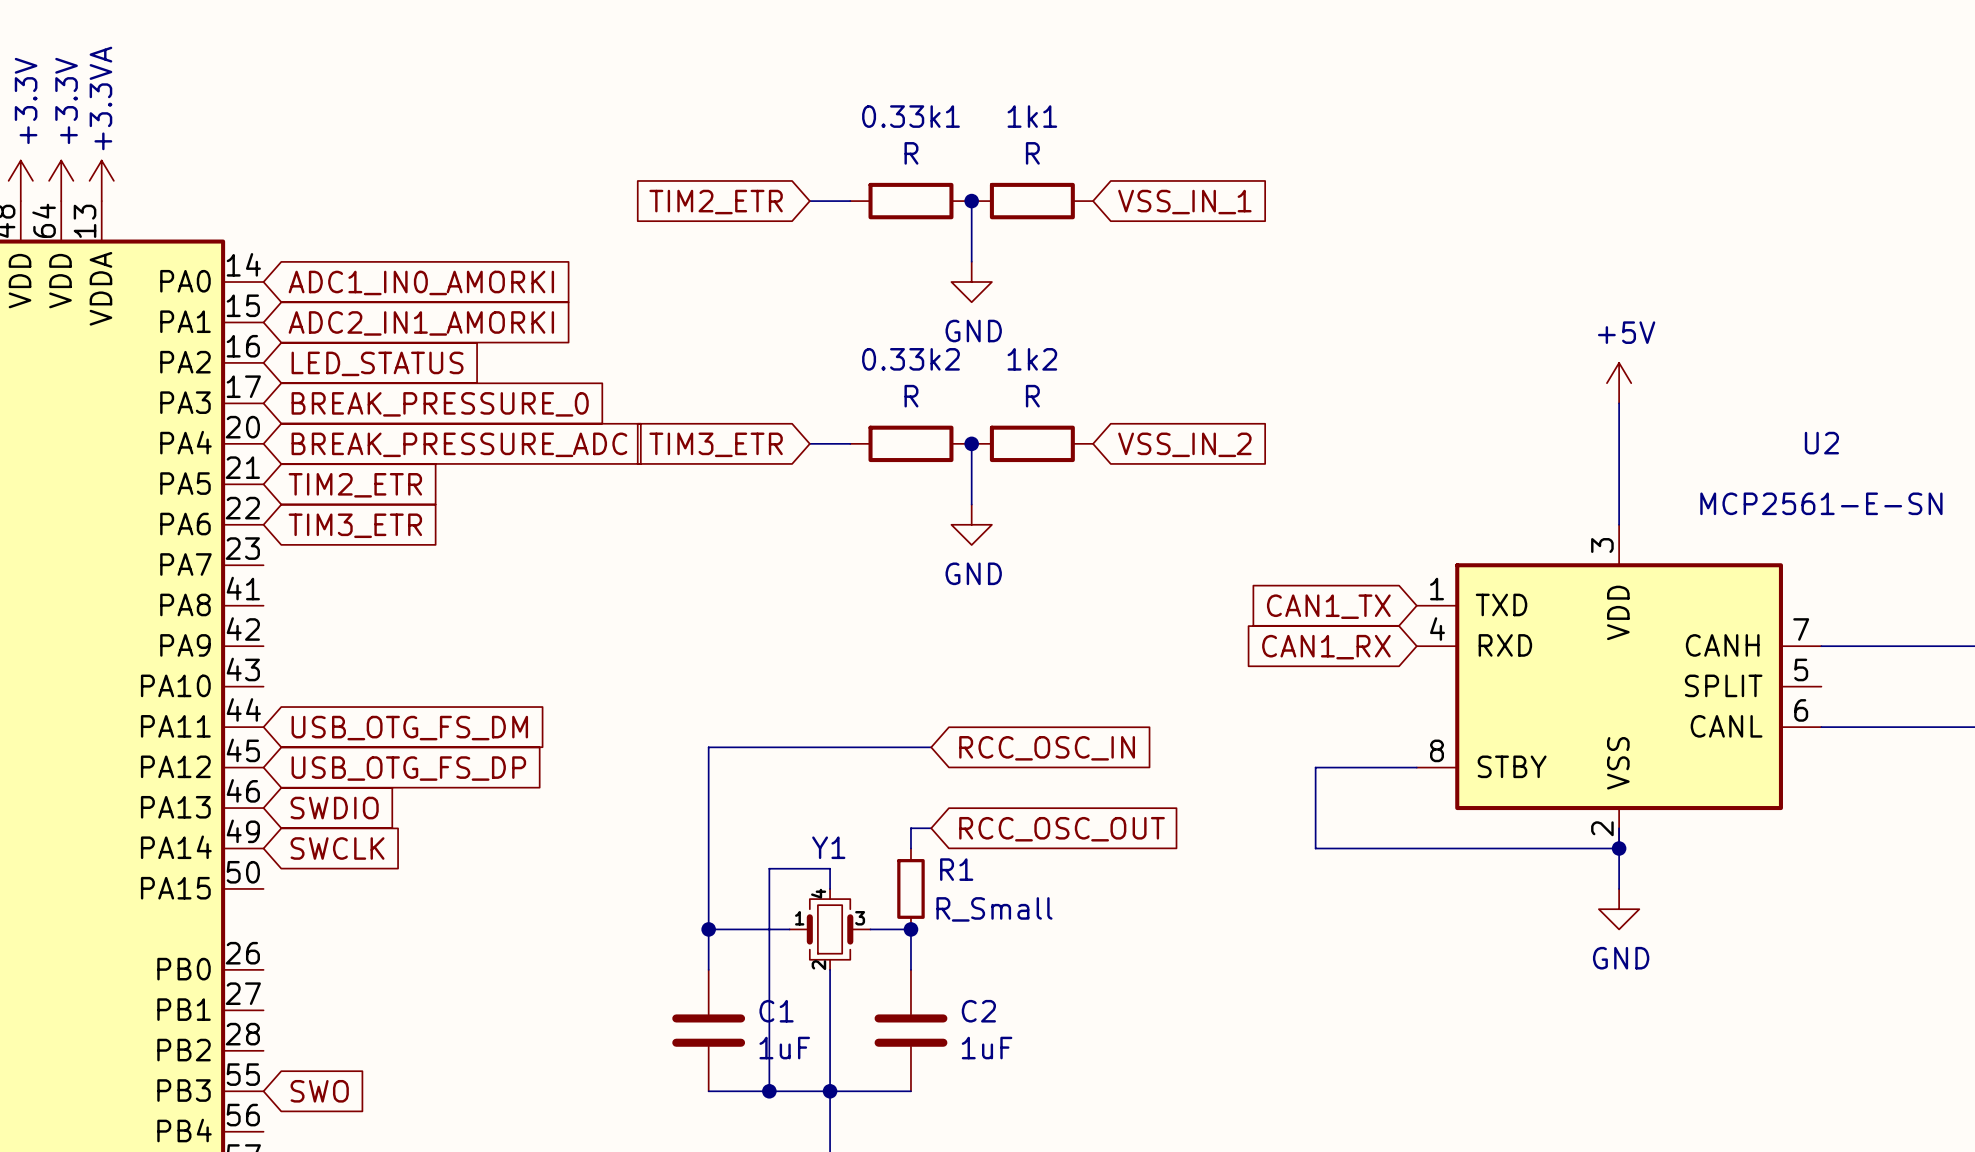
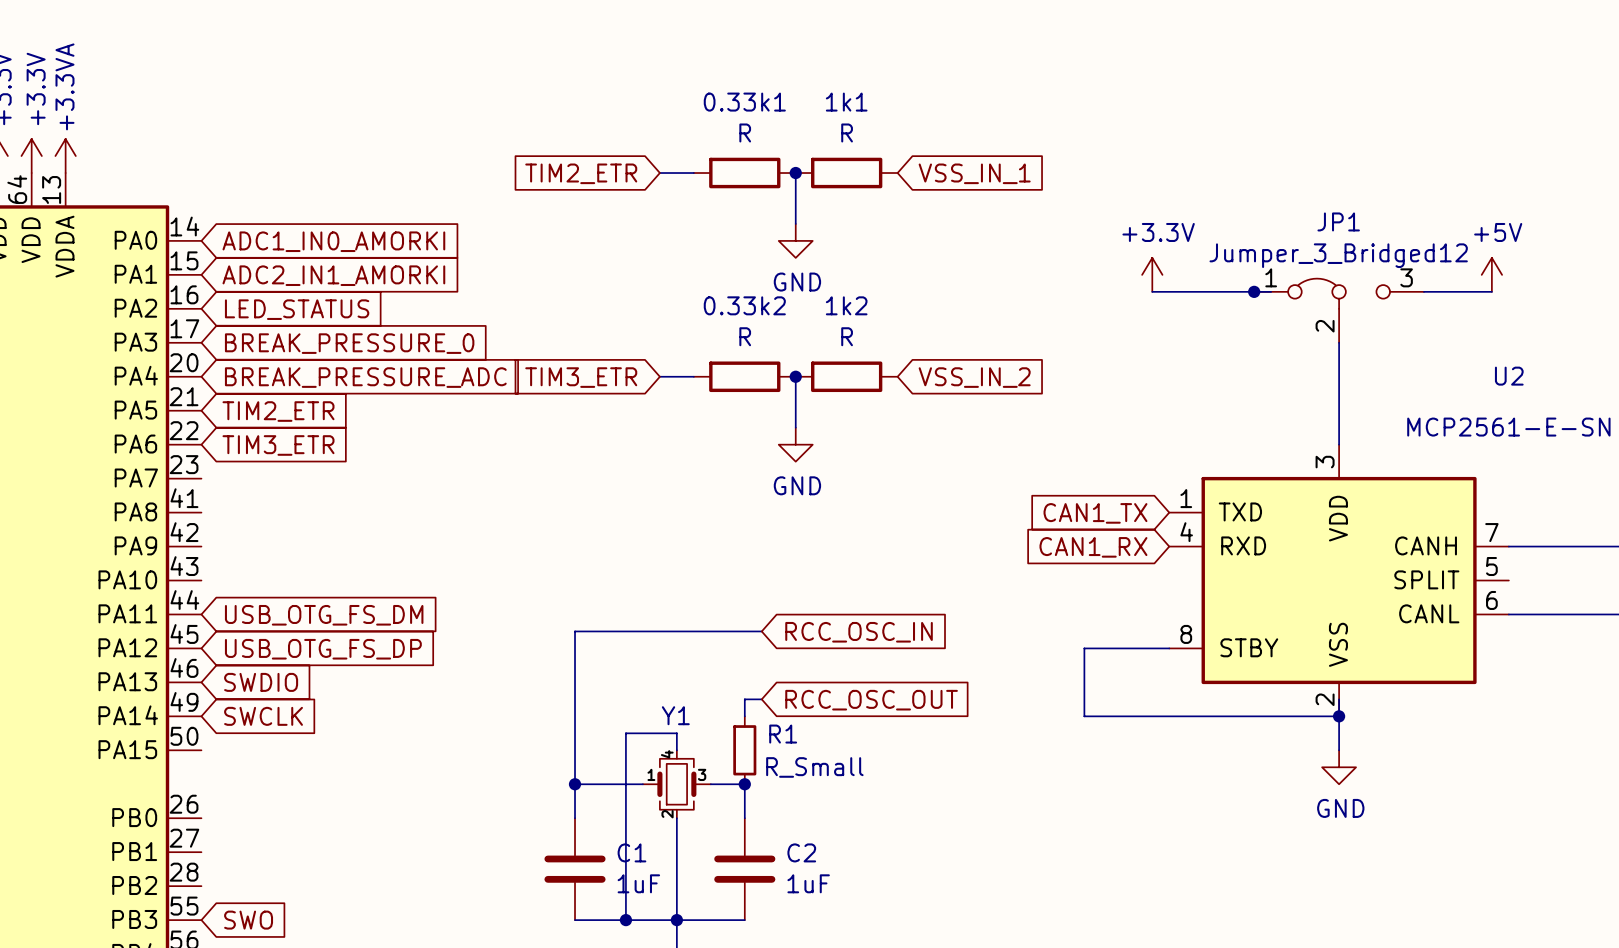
power symbol: none -> +3.3V (1152, 274)
wire: none -> (1152, 291) (1271, 291)
junction: none -> (1254, 291)
wire: none -> (1423, 291) (1491, 291)
JP1: none -> Jumper_3_Bridged12 (1339, 310)
power symbol position: +5V (1619, 383) -> +5V (1491, 274)

